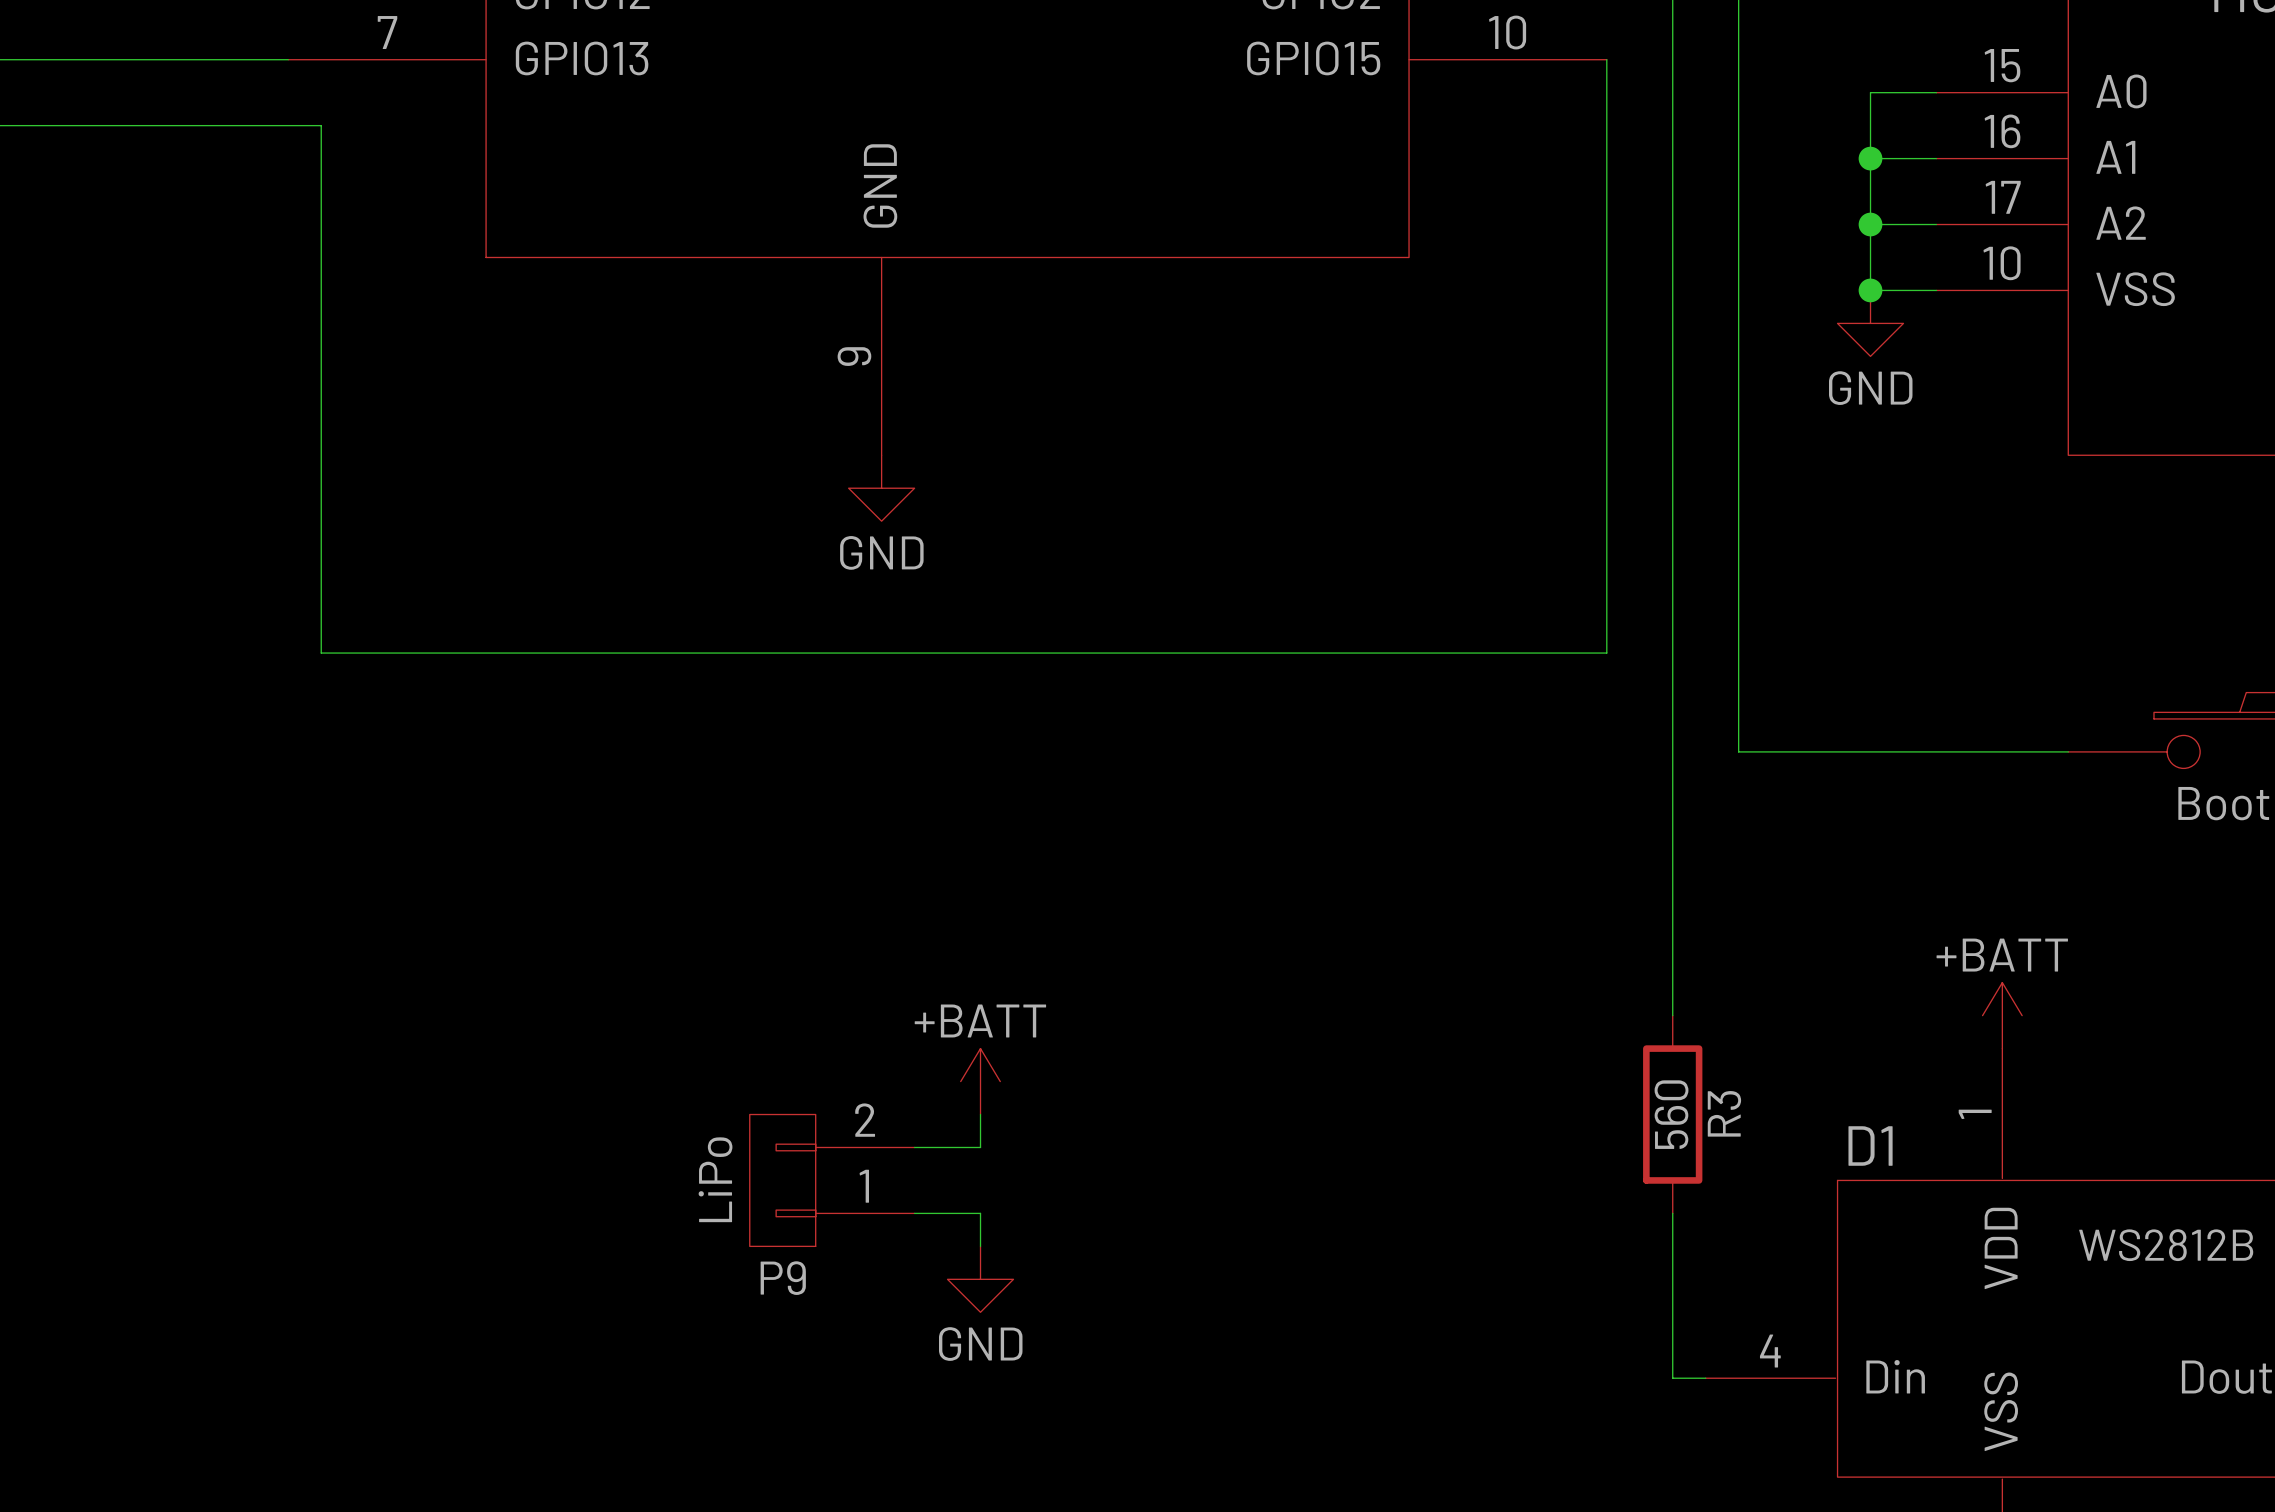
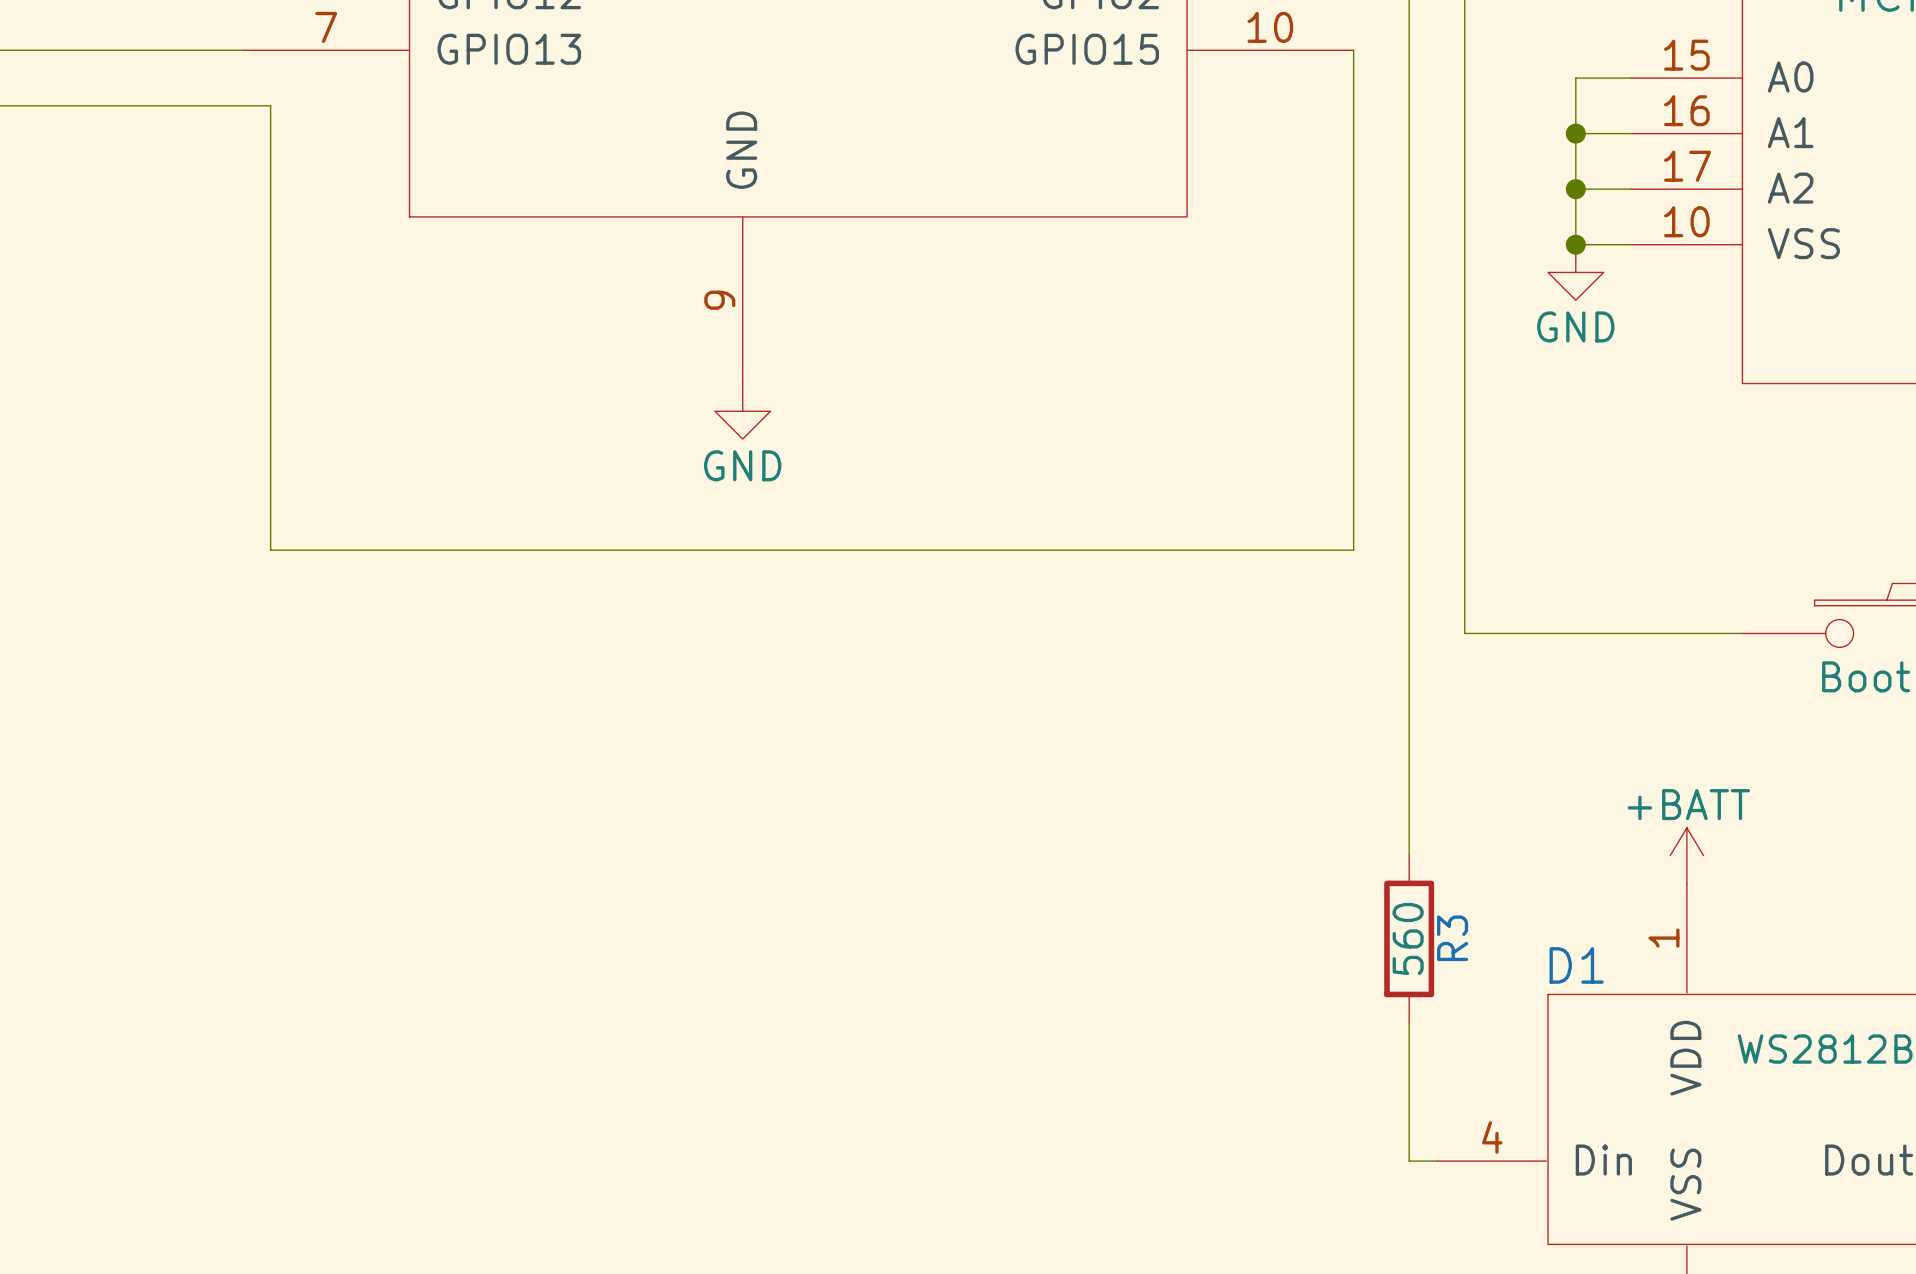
power symbol: +BATT (980, 1081) -> none
wire: (980, 1114) (980, 1147) (914, 1147) -> none
P9: LiPo (832, 1180) -> none
wire: (914, 1213) (980, 1213) (980, 1246) -> none
power symbol: GND (980, 1279) -> none

